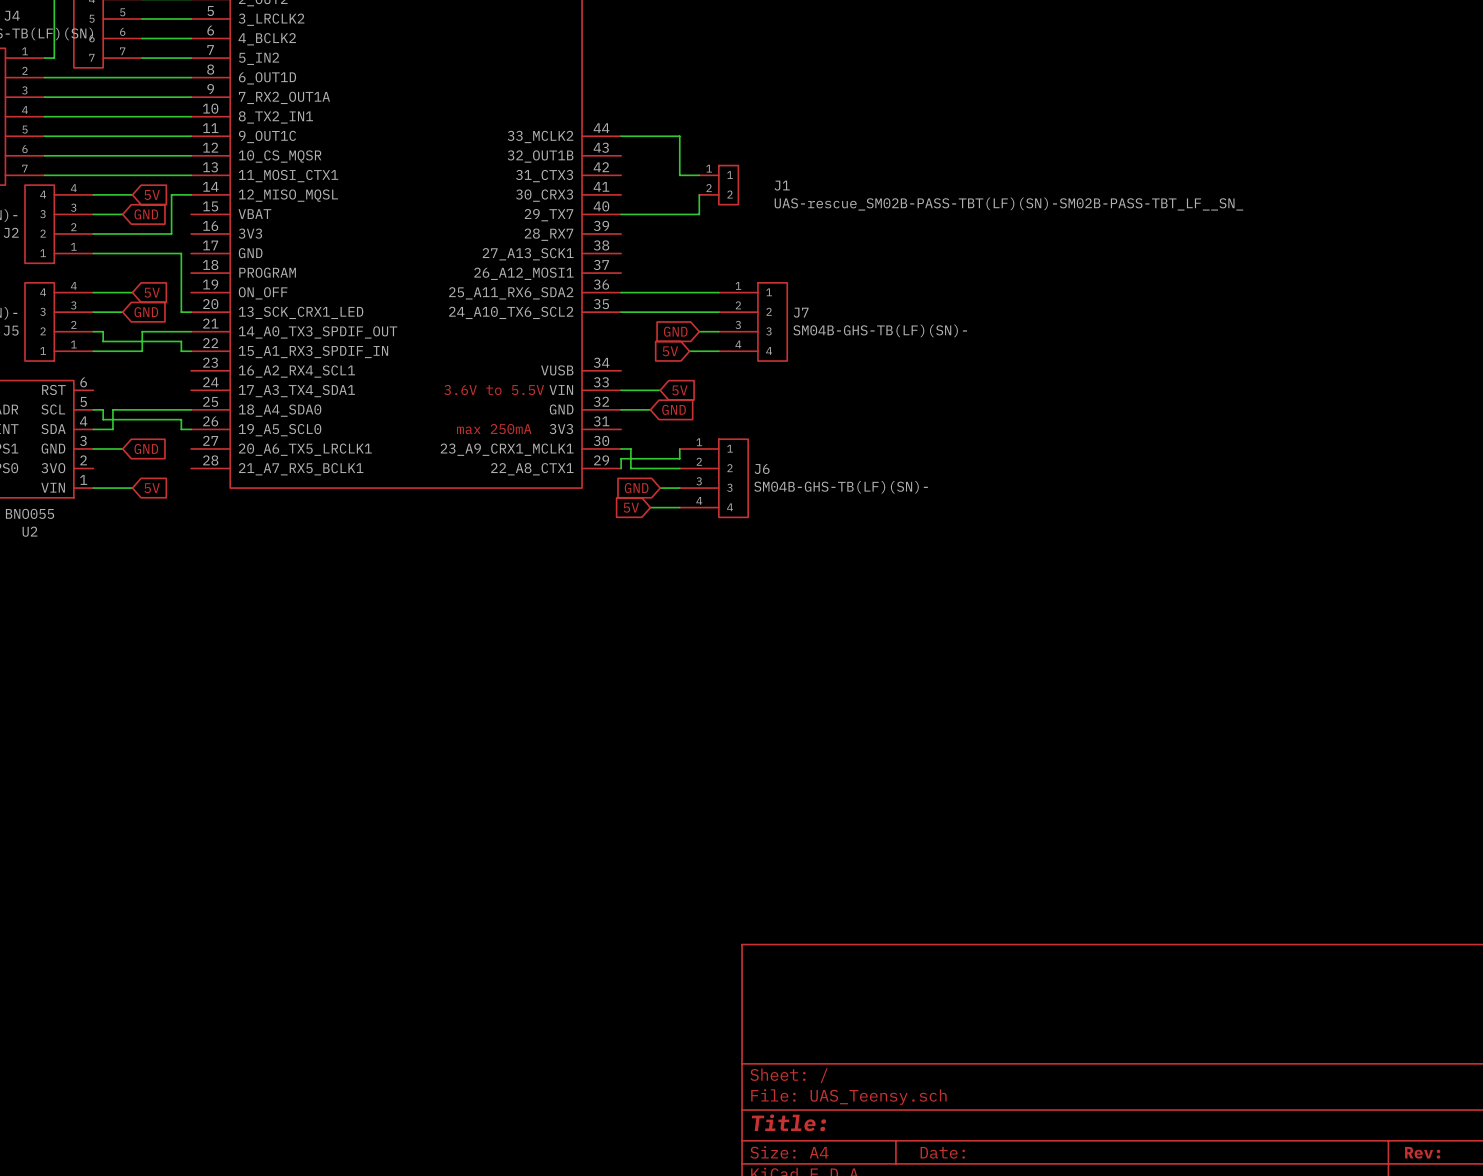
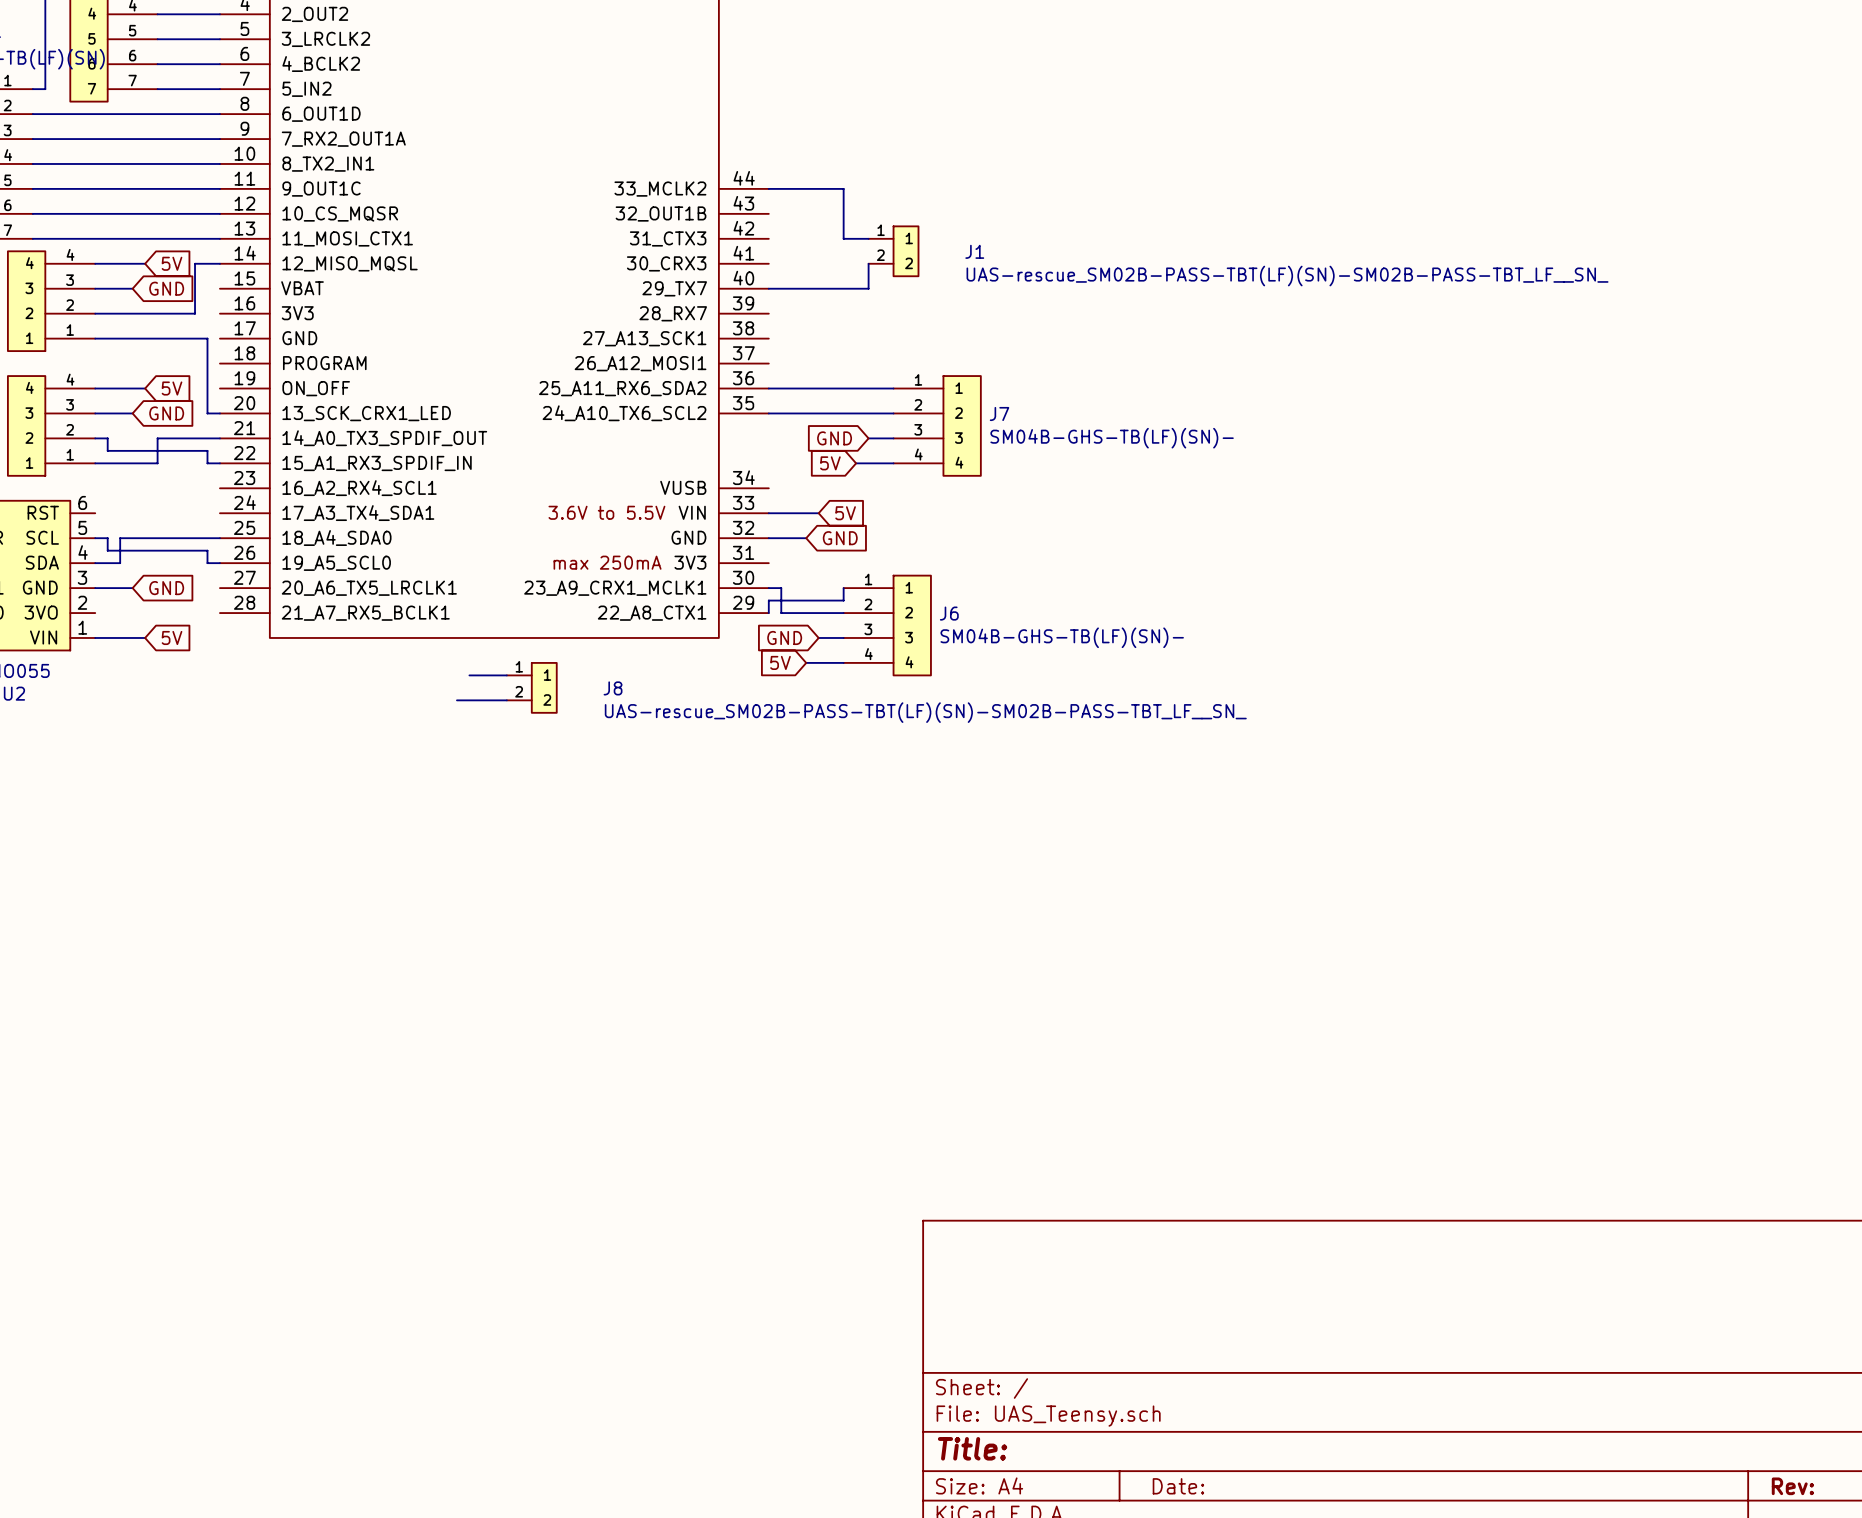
wire: none -> (469, 675) (506, 675)
J8: none -> UAS-rescue_SM02B-PASS-TBT(LF)(SN)-SM02B-PASS-TBT_LF__SN_ (531, 687)
wire: none -> (456, 700) (506, 700)

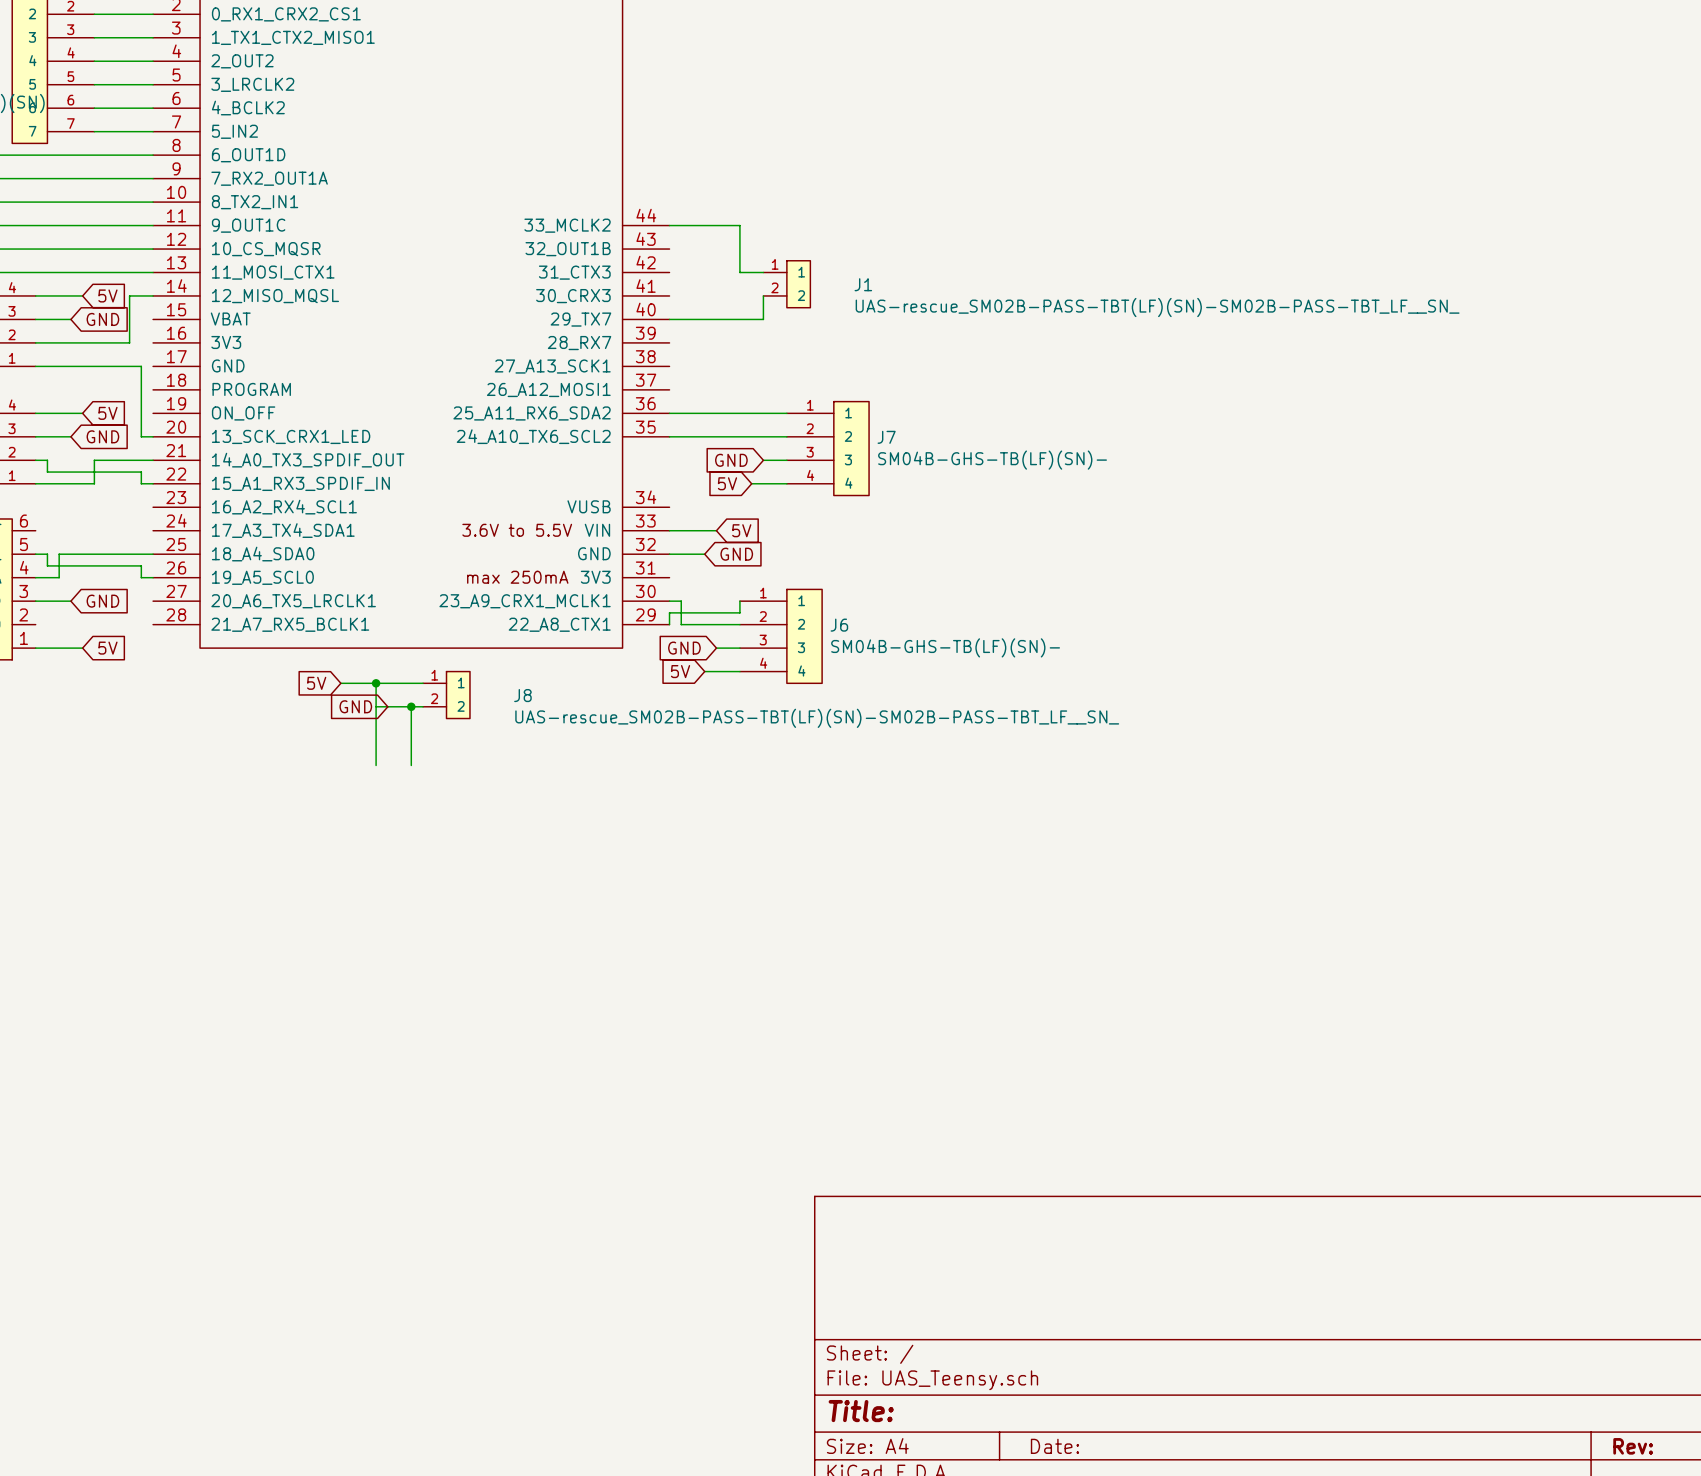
global label: none -> 5V (316, 683)
wire: none -> (340, 683) (387, 683)
wire: none -> (376, 683) (376, 765)
junction: none -> (376, 683)
global label: none -> GND (355, 706)
wire: none -> (411, 706) (411, 765)
junction: none -> (411, 706)

